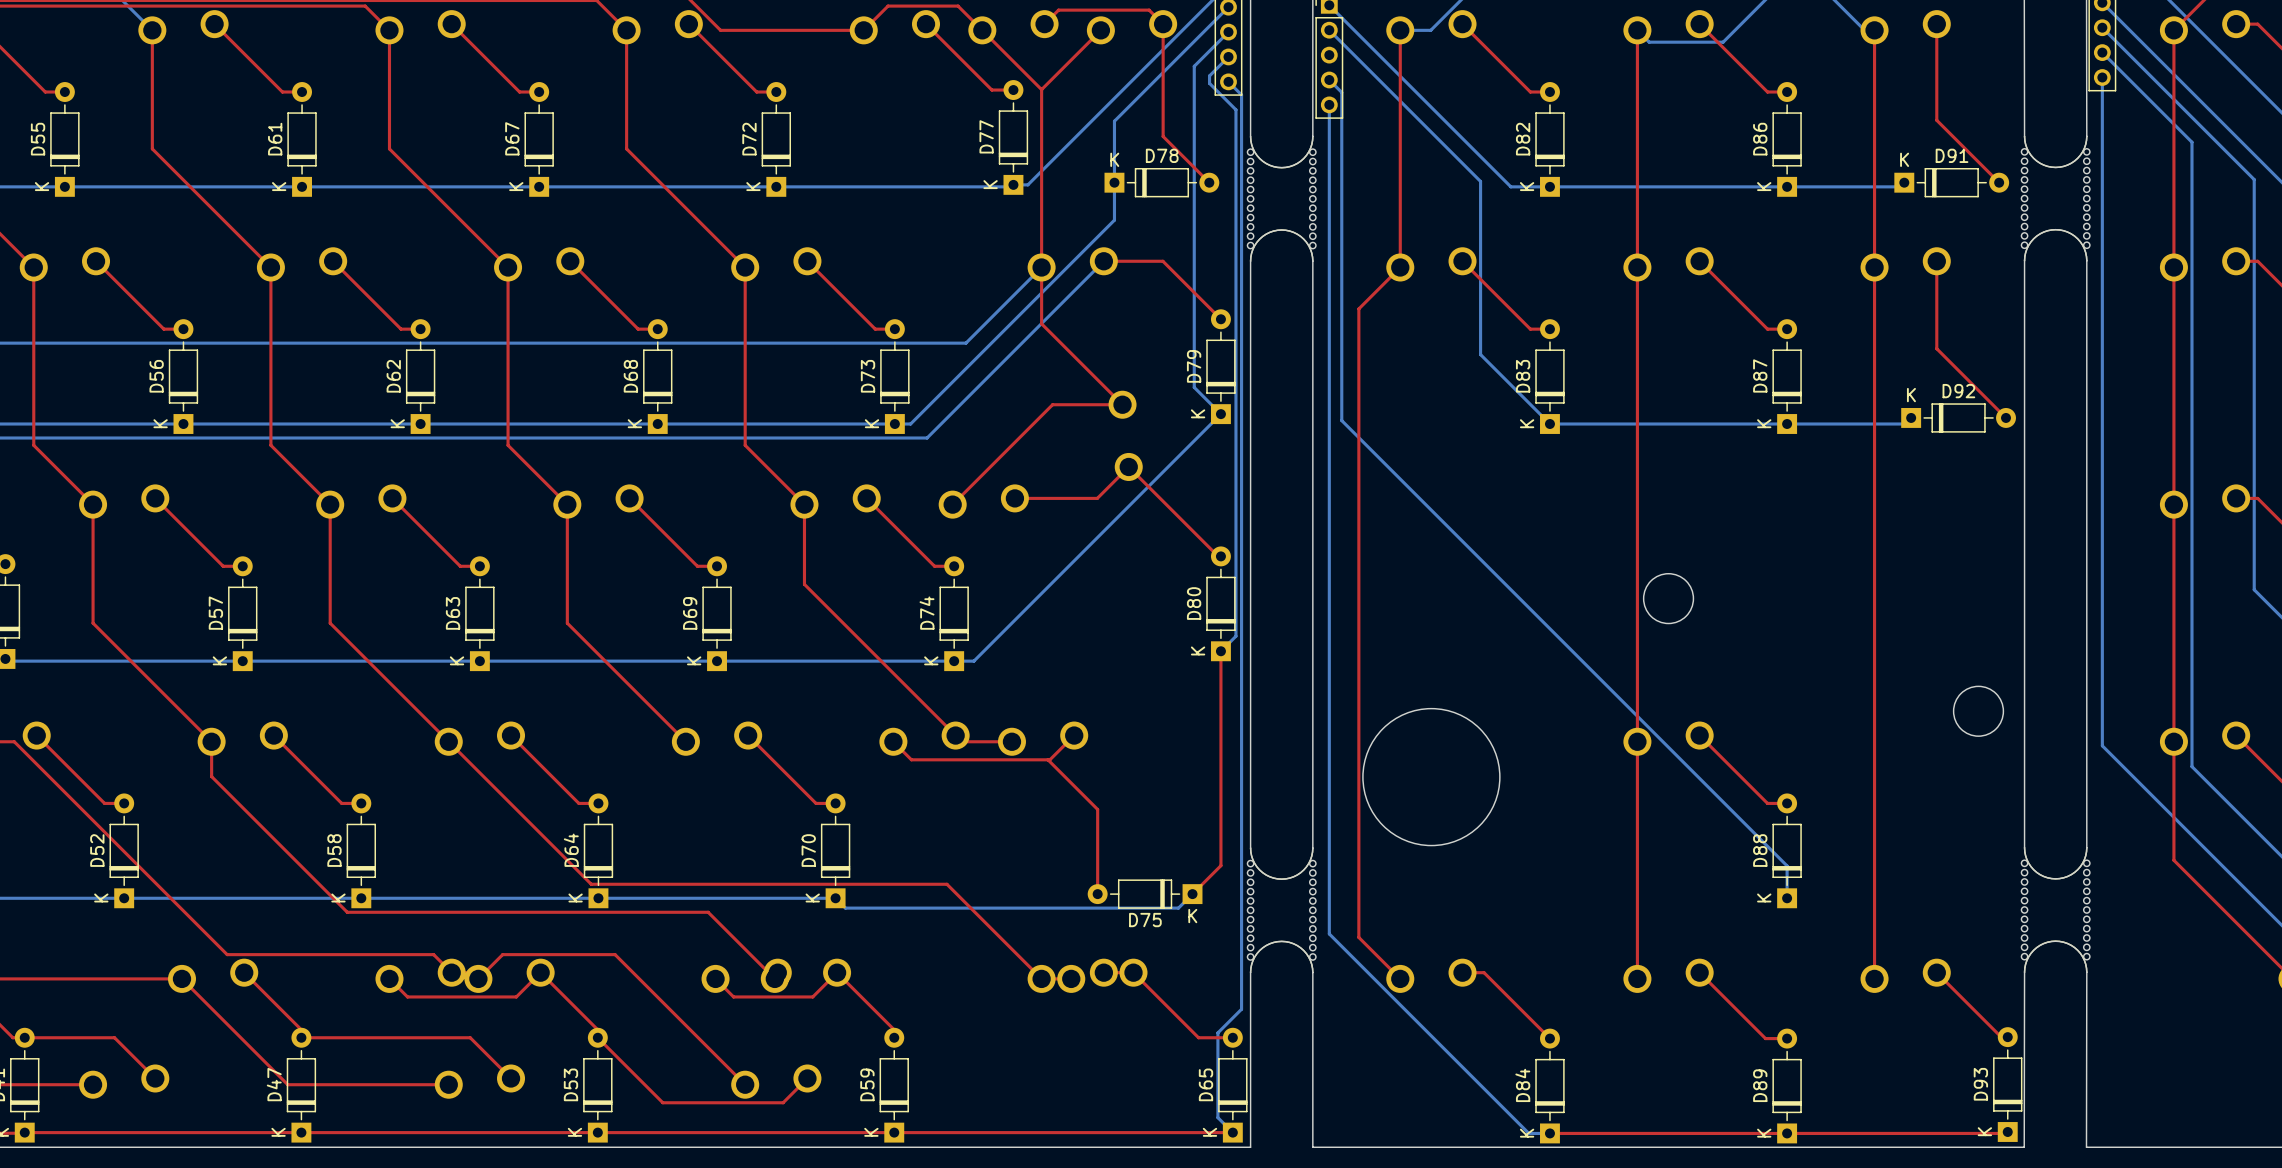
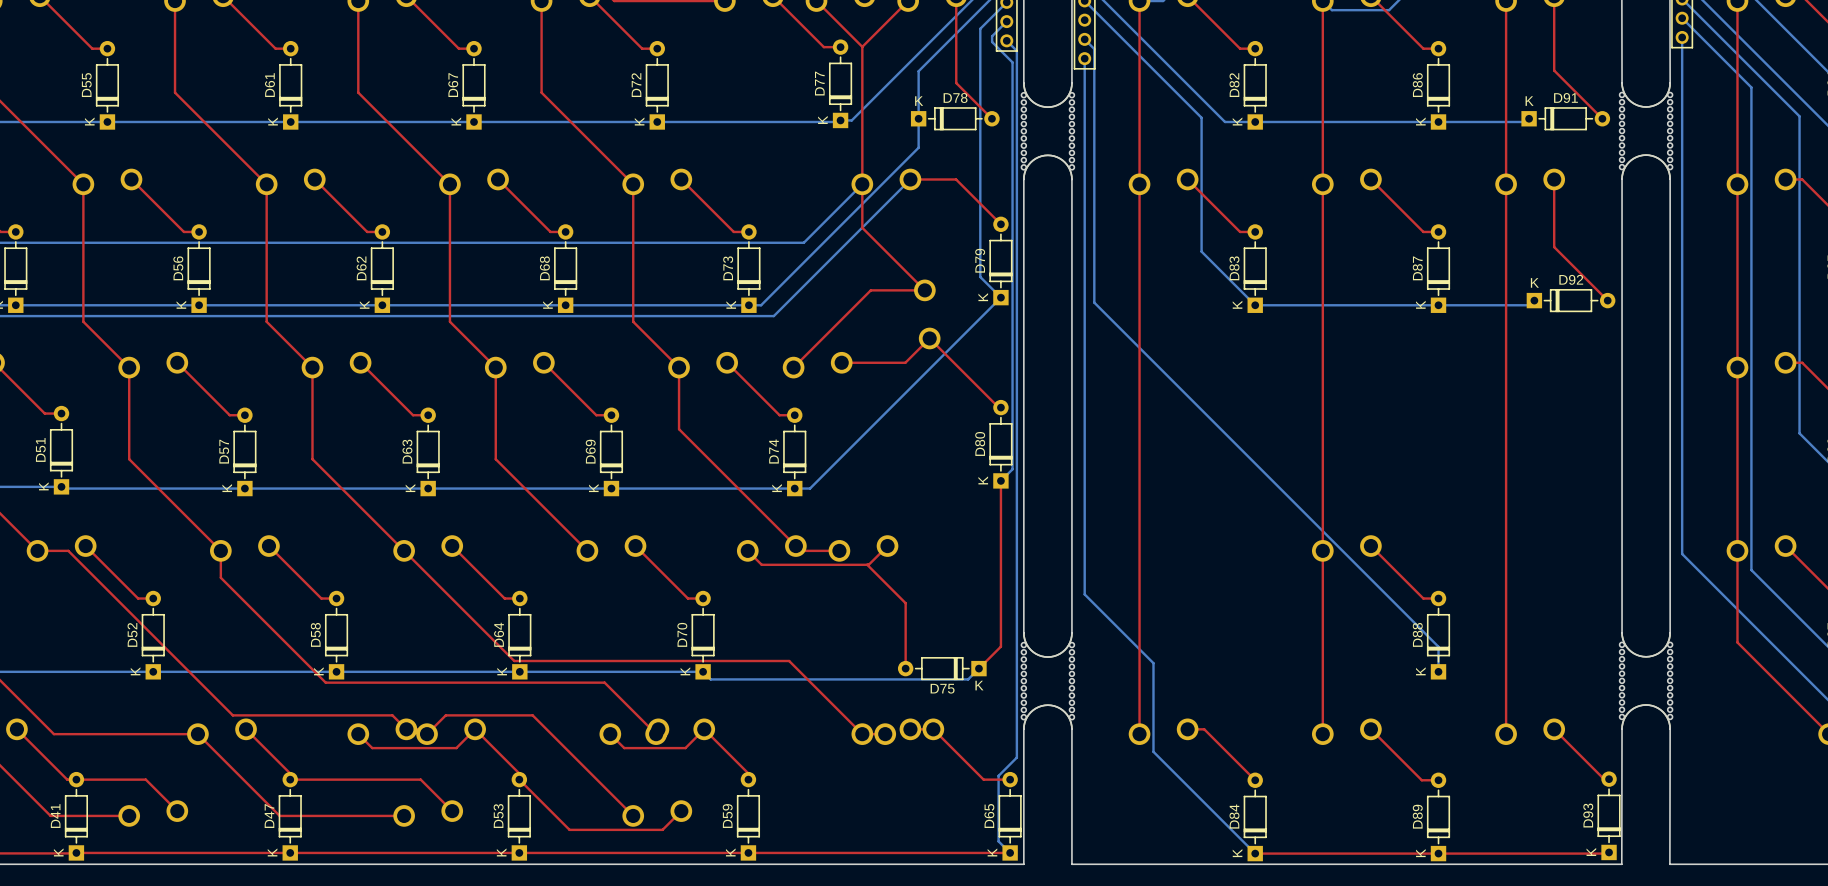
top track: (1400, 267) (1358, 308) (1358, 937) (1400, 978) -> (1139, 184) (1139, 734)
round board edge: [1643, 573, 1695, 625] -> none
round board edge: [1952, 685, 2005, 737] -> none
round board edge: [1362, 708, 1501, 847] -> none
bottom track: (1329, 798) (1329, 933) (1528, 1133) (1549, 1133) -> (1084, 594) (1153, 663) (1153, 751) (1255, 853)

